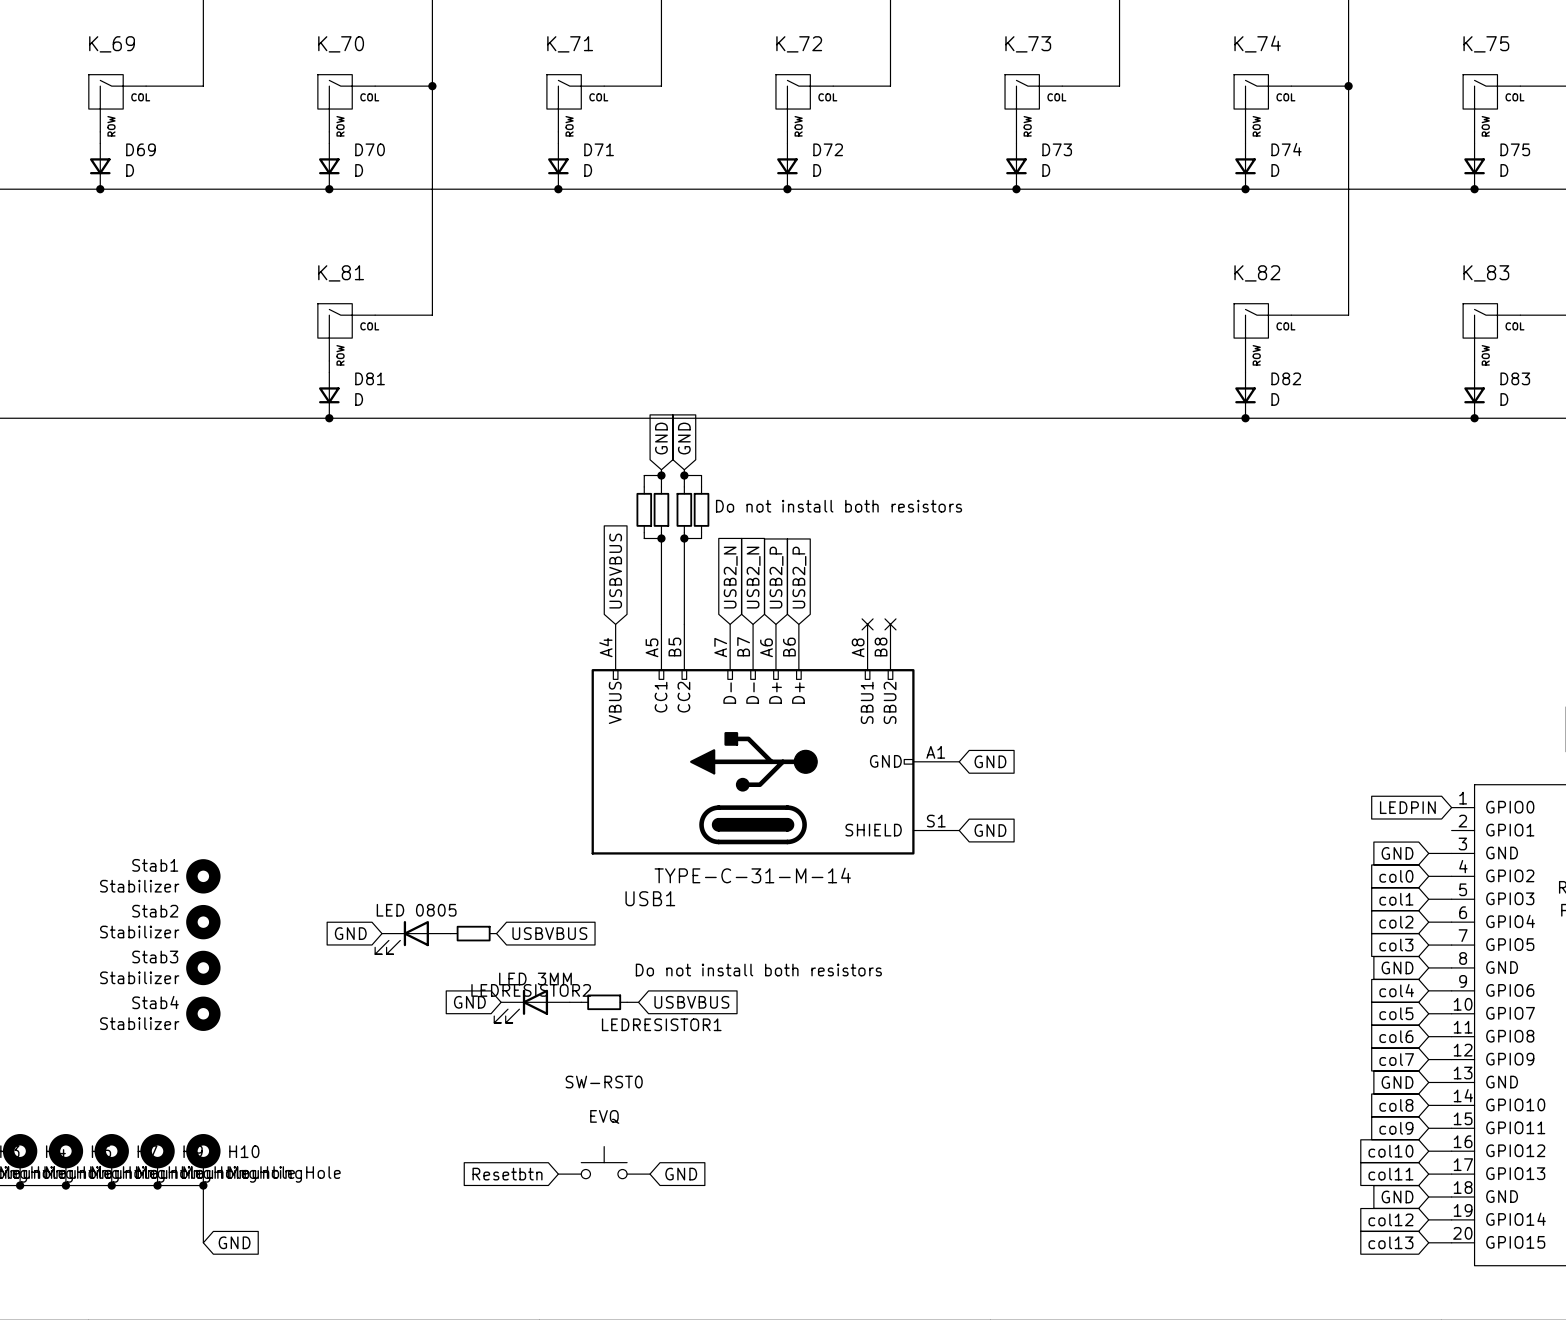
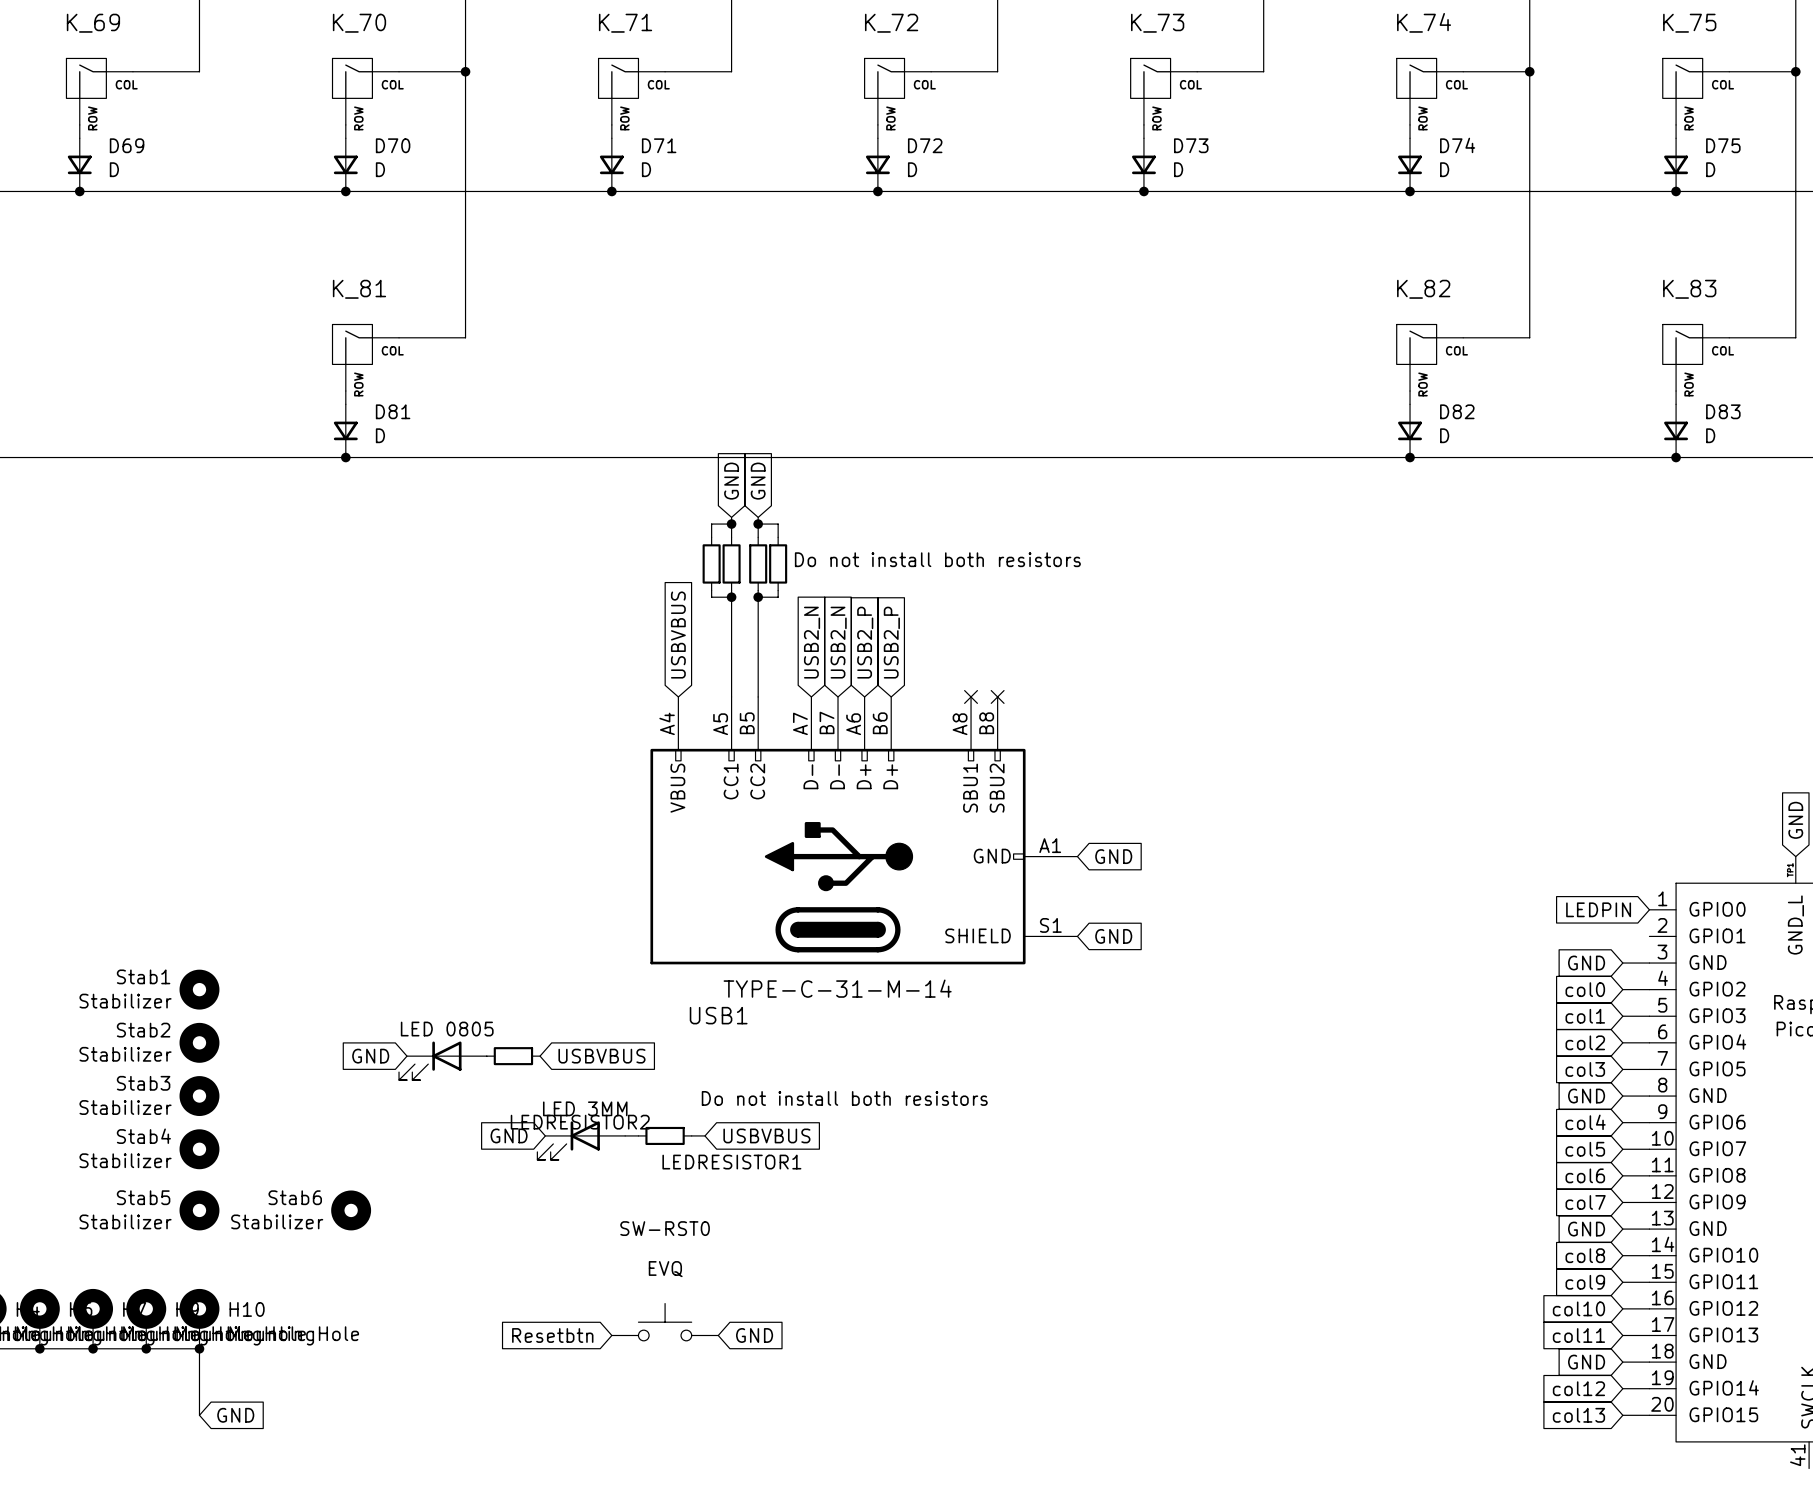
Stab5: none -> Stabilizer (199, 1210)
Stab6: none -> Stabilizer (351, 1210)

